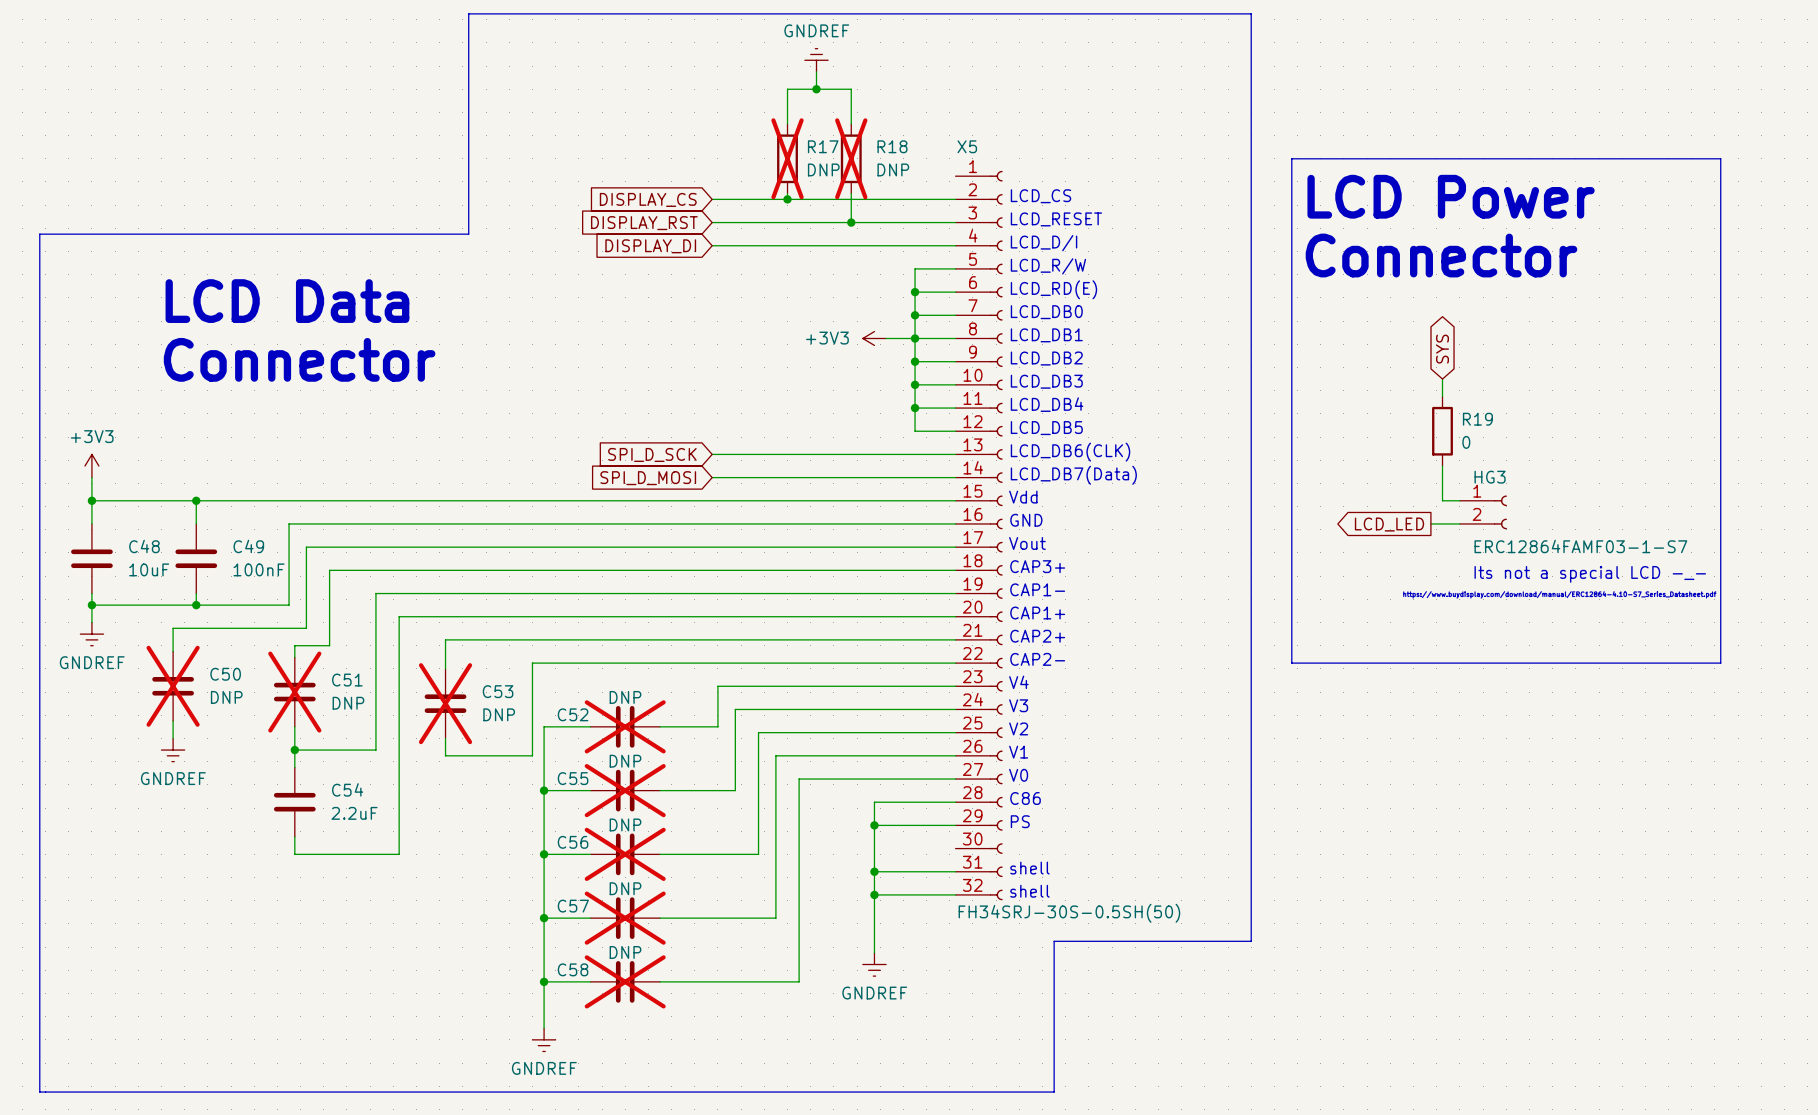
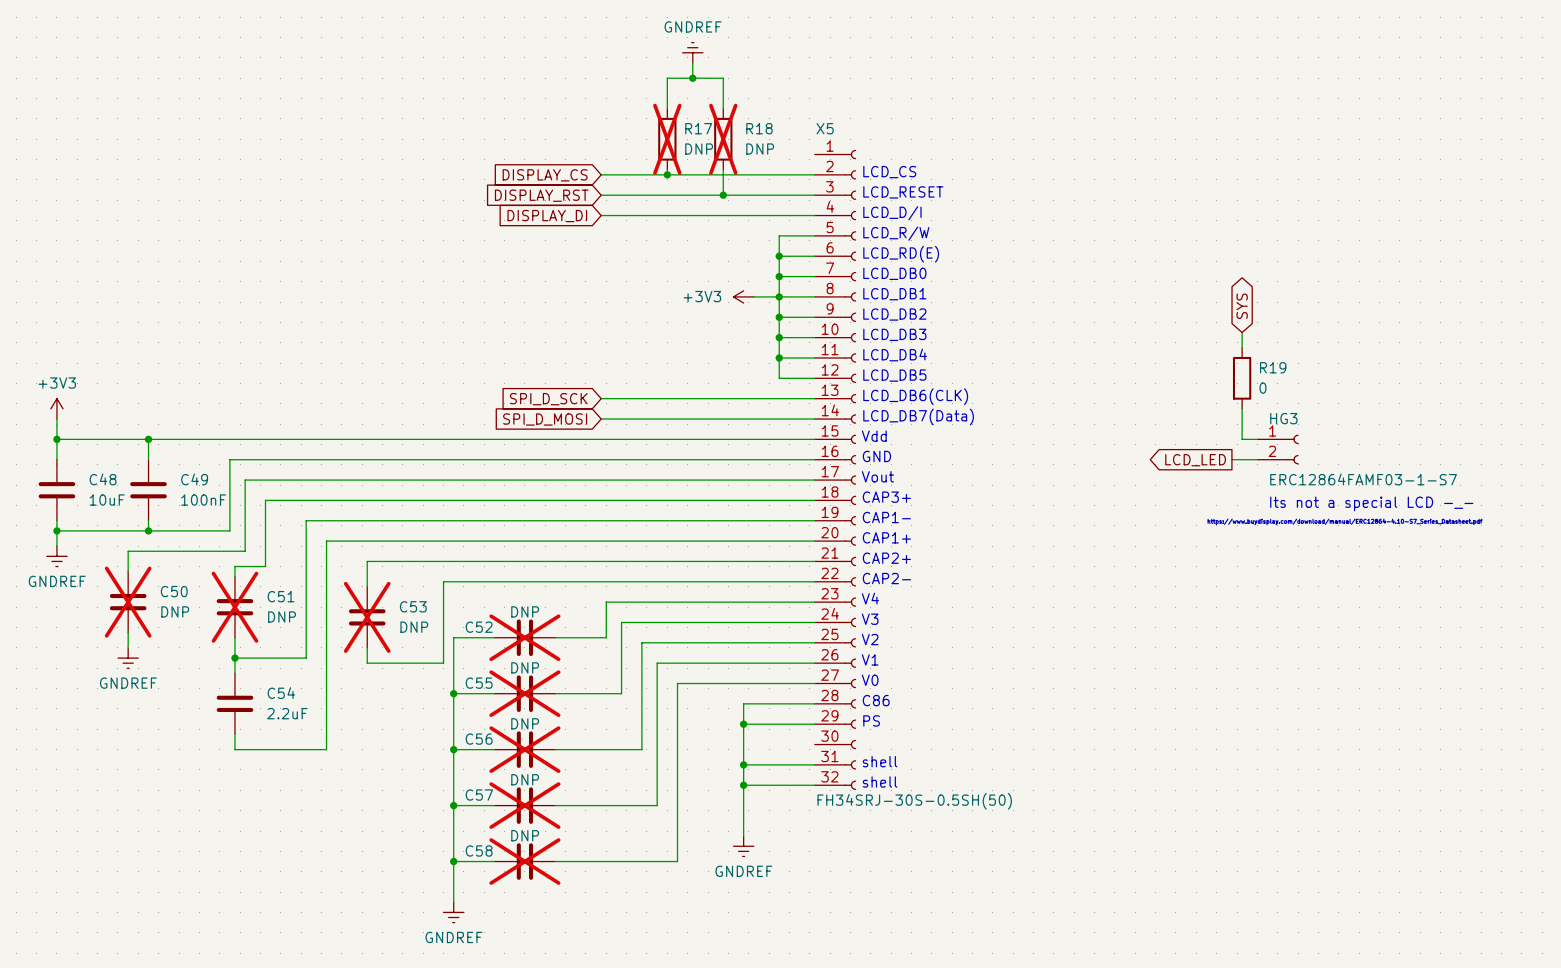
line: (468, 13) (468, 234) (39, 234) (39, 1092) (1054, 1092) (1054, 941) (1251, 941) (1251, 13) (468, 13) -> none
line: (1291, 158) (1720, 158) (1720, 663) (1291, 663) (1291, 158) -> none
text: LCD Power (1451, 196) -> none
text: Connector (1441, 255) -> none
text: LCD Data (287, 301) -> none
text: Connector (299, 359) -> none

